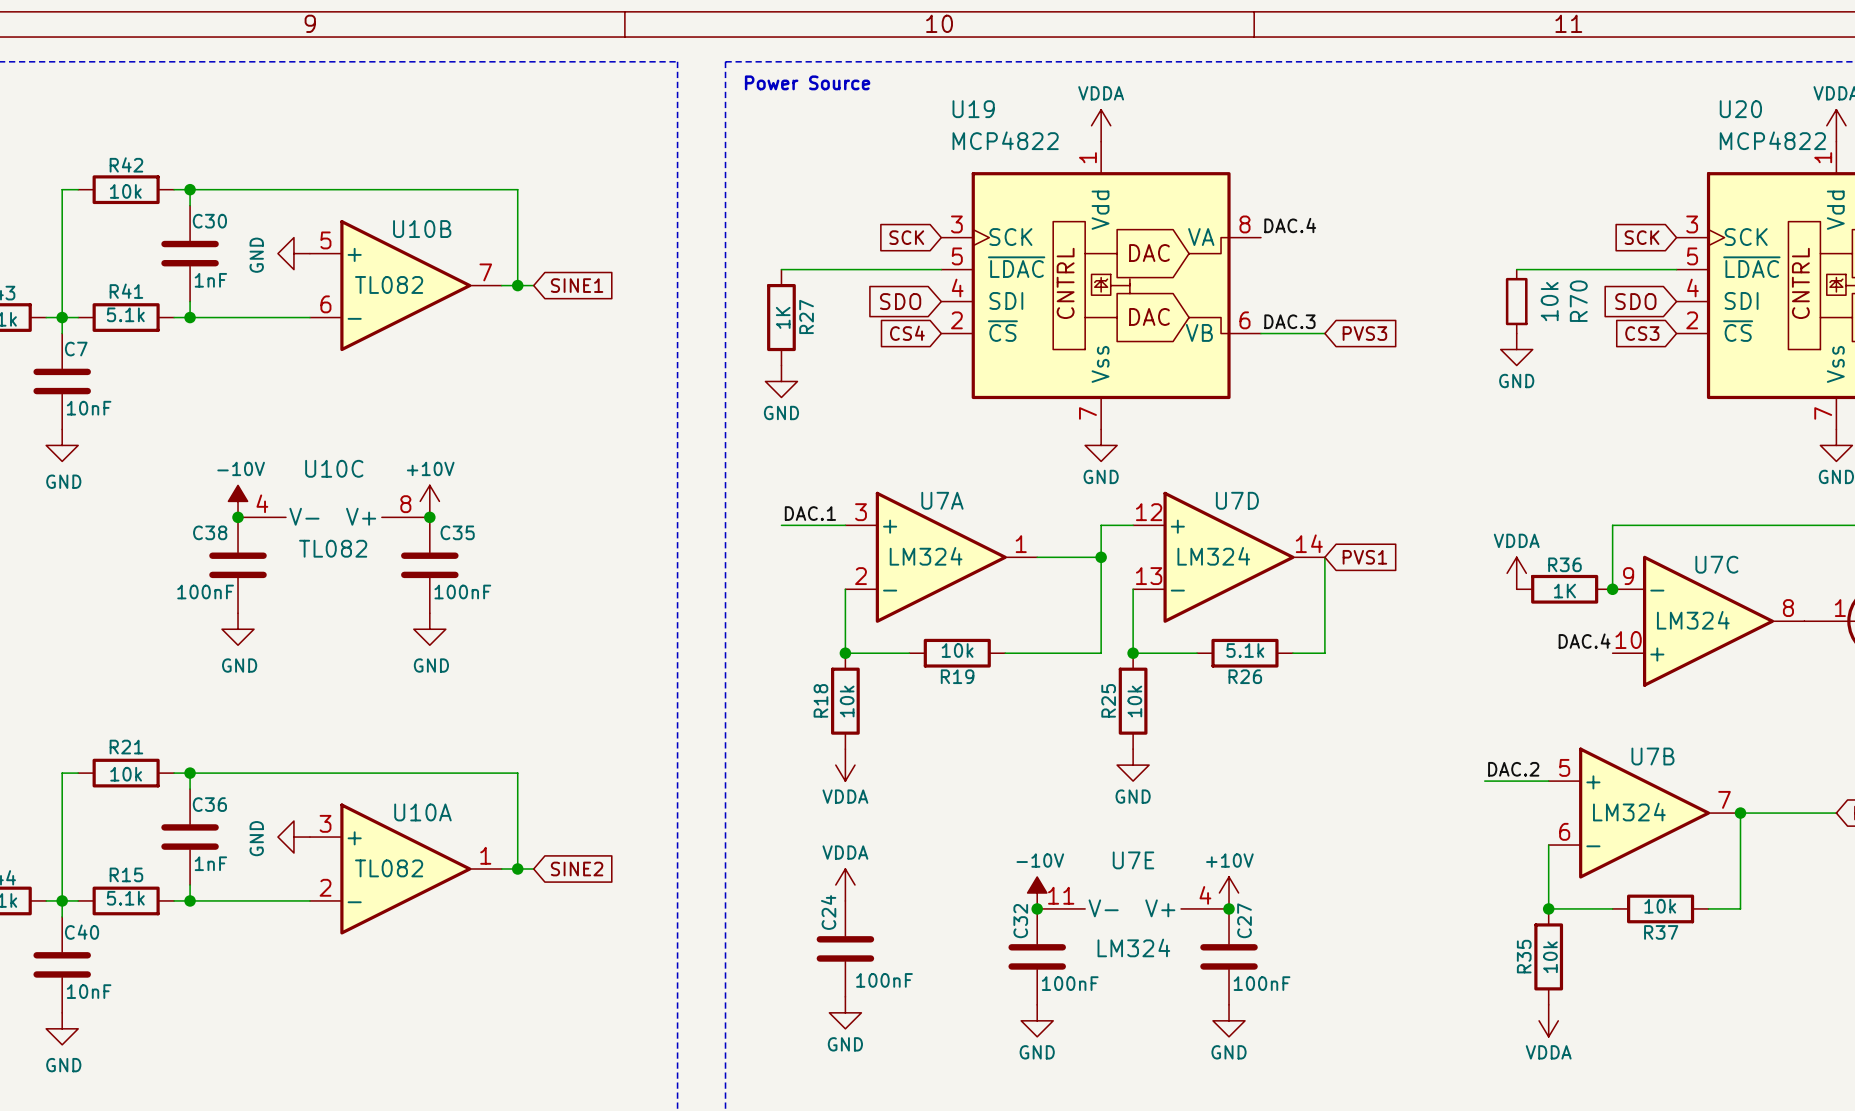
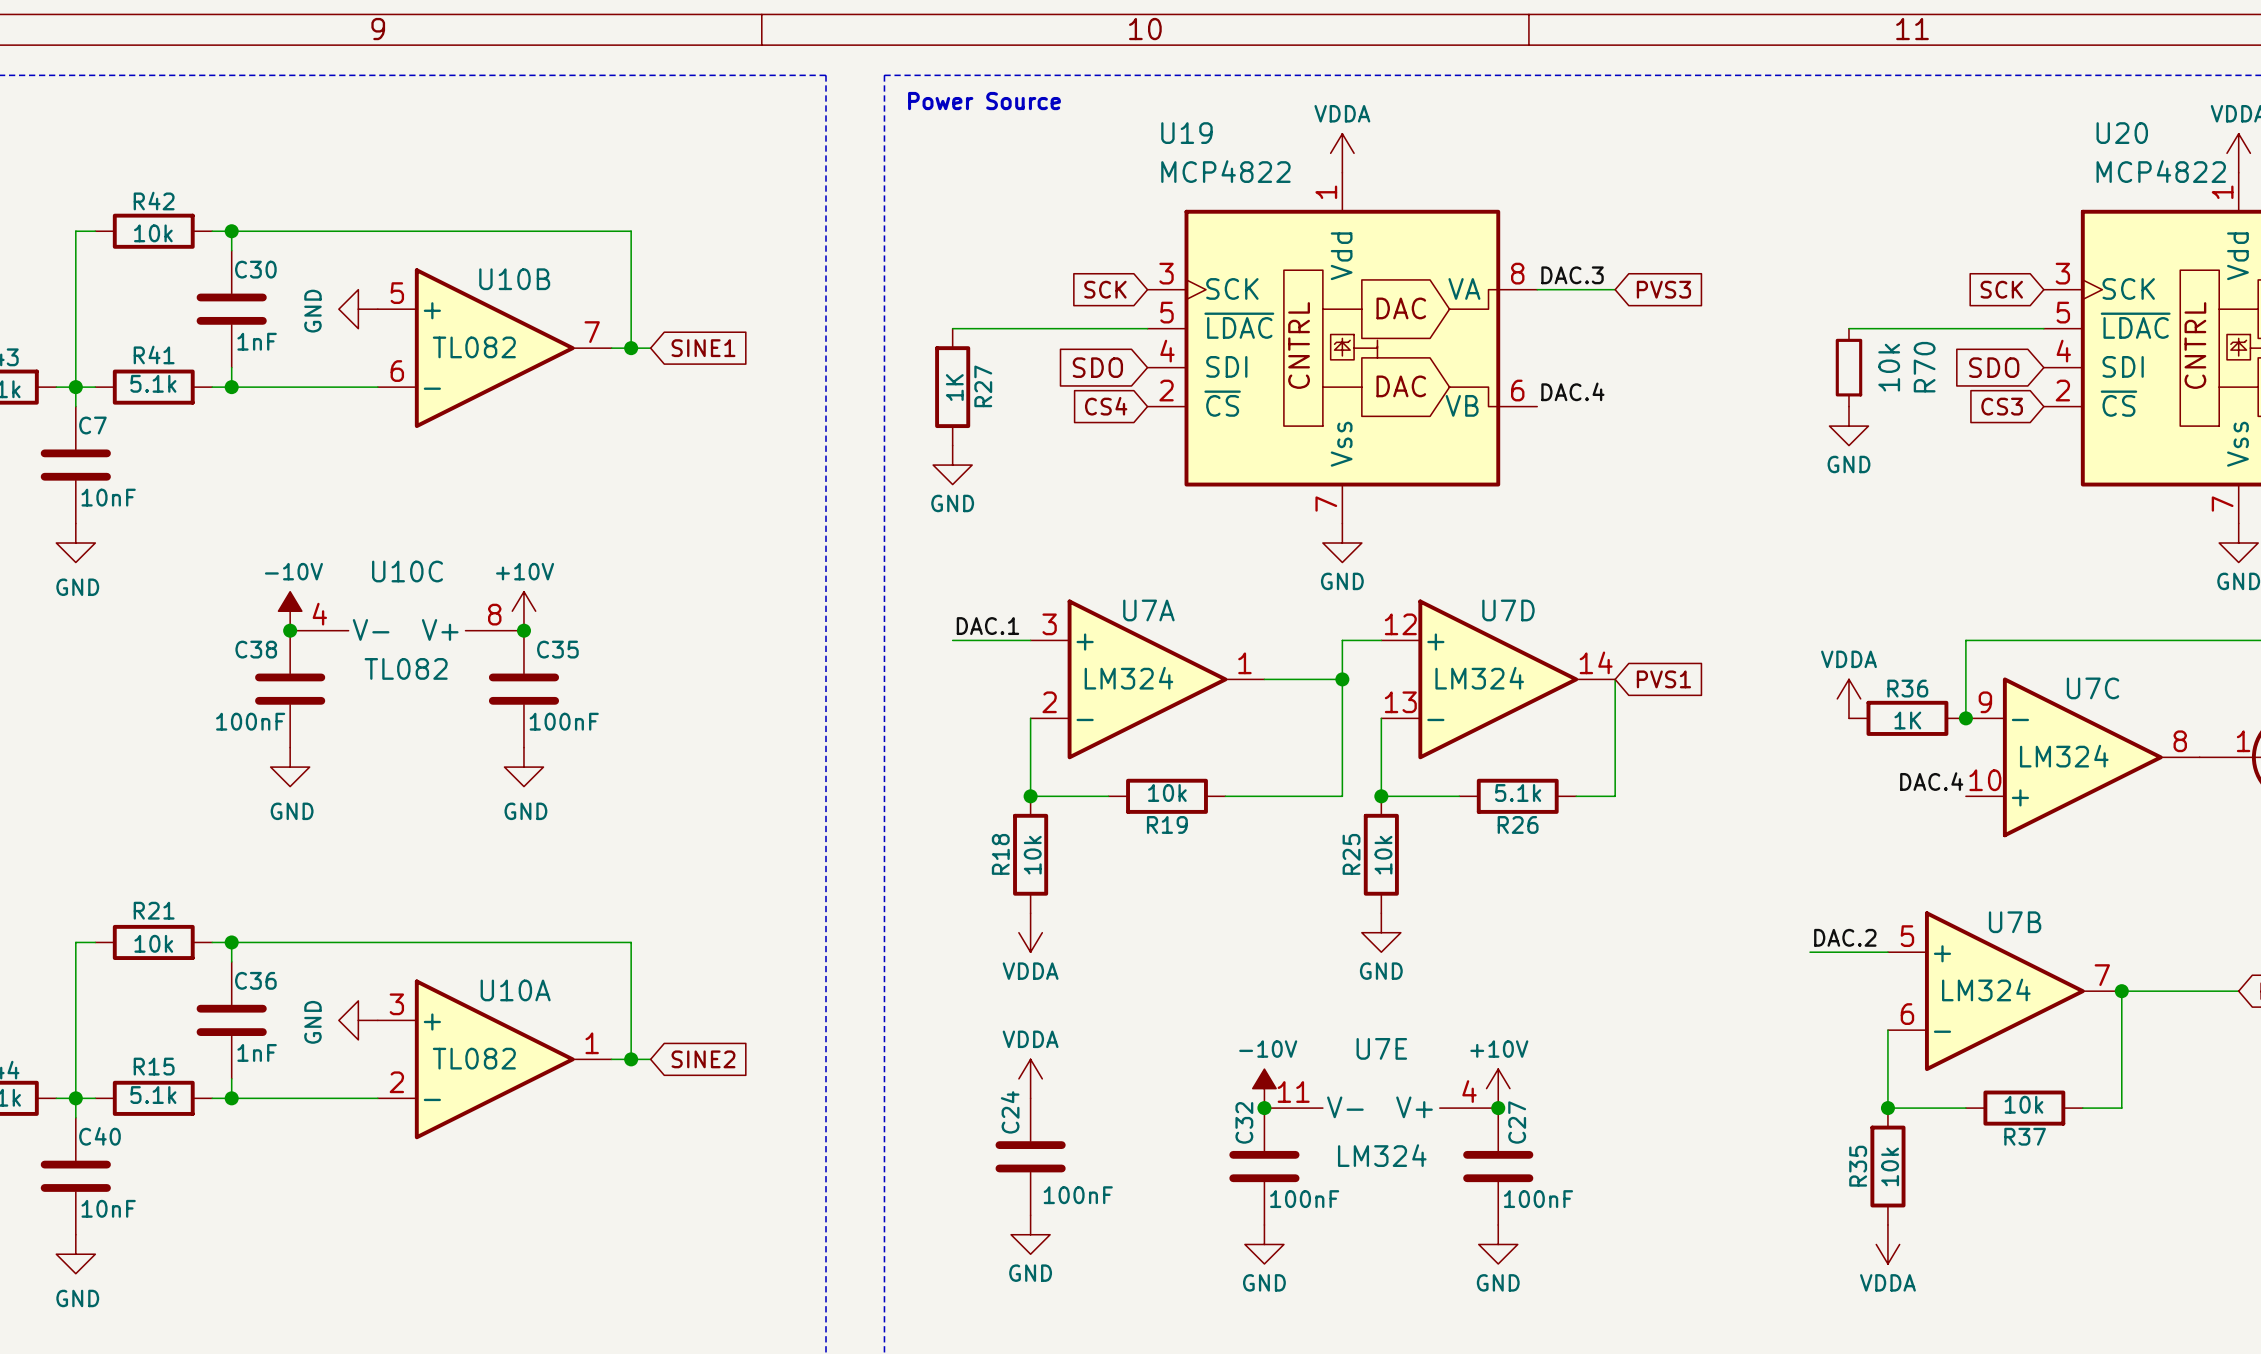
label: DAC.4 (1290, 225) -> DAC.3 (1572, 275)
label: DAC.3 (1289, 321) -> DAC.4 (1572, 391)
wire: (1260, 333) (1324, 333) -> (1537, 289) (1615, 289)
global label position: PVS3 (1364, 333) -> PVS3 (1663, 289)

